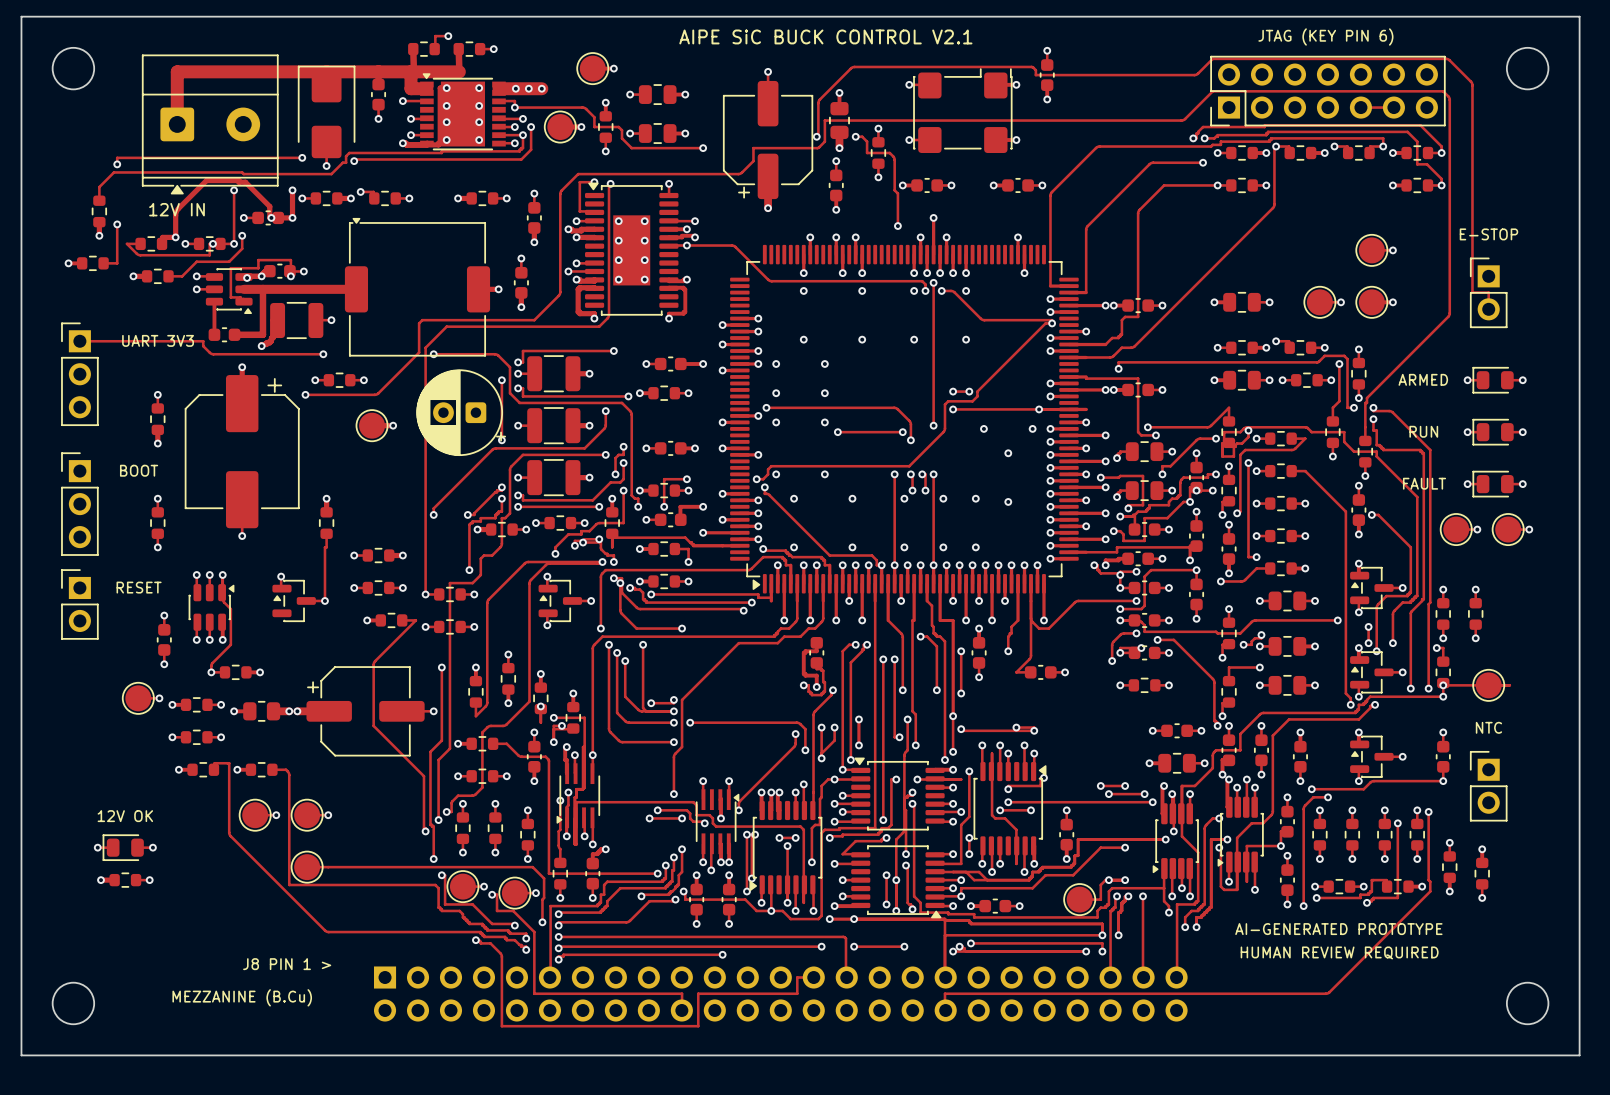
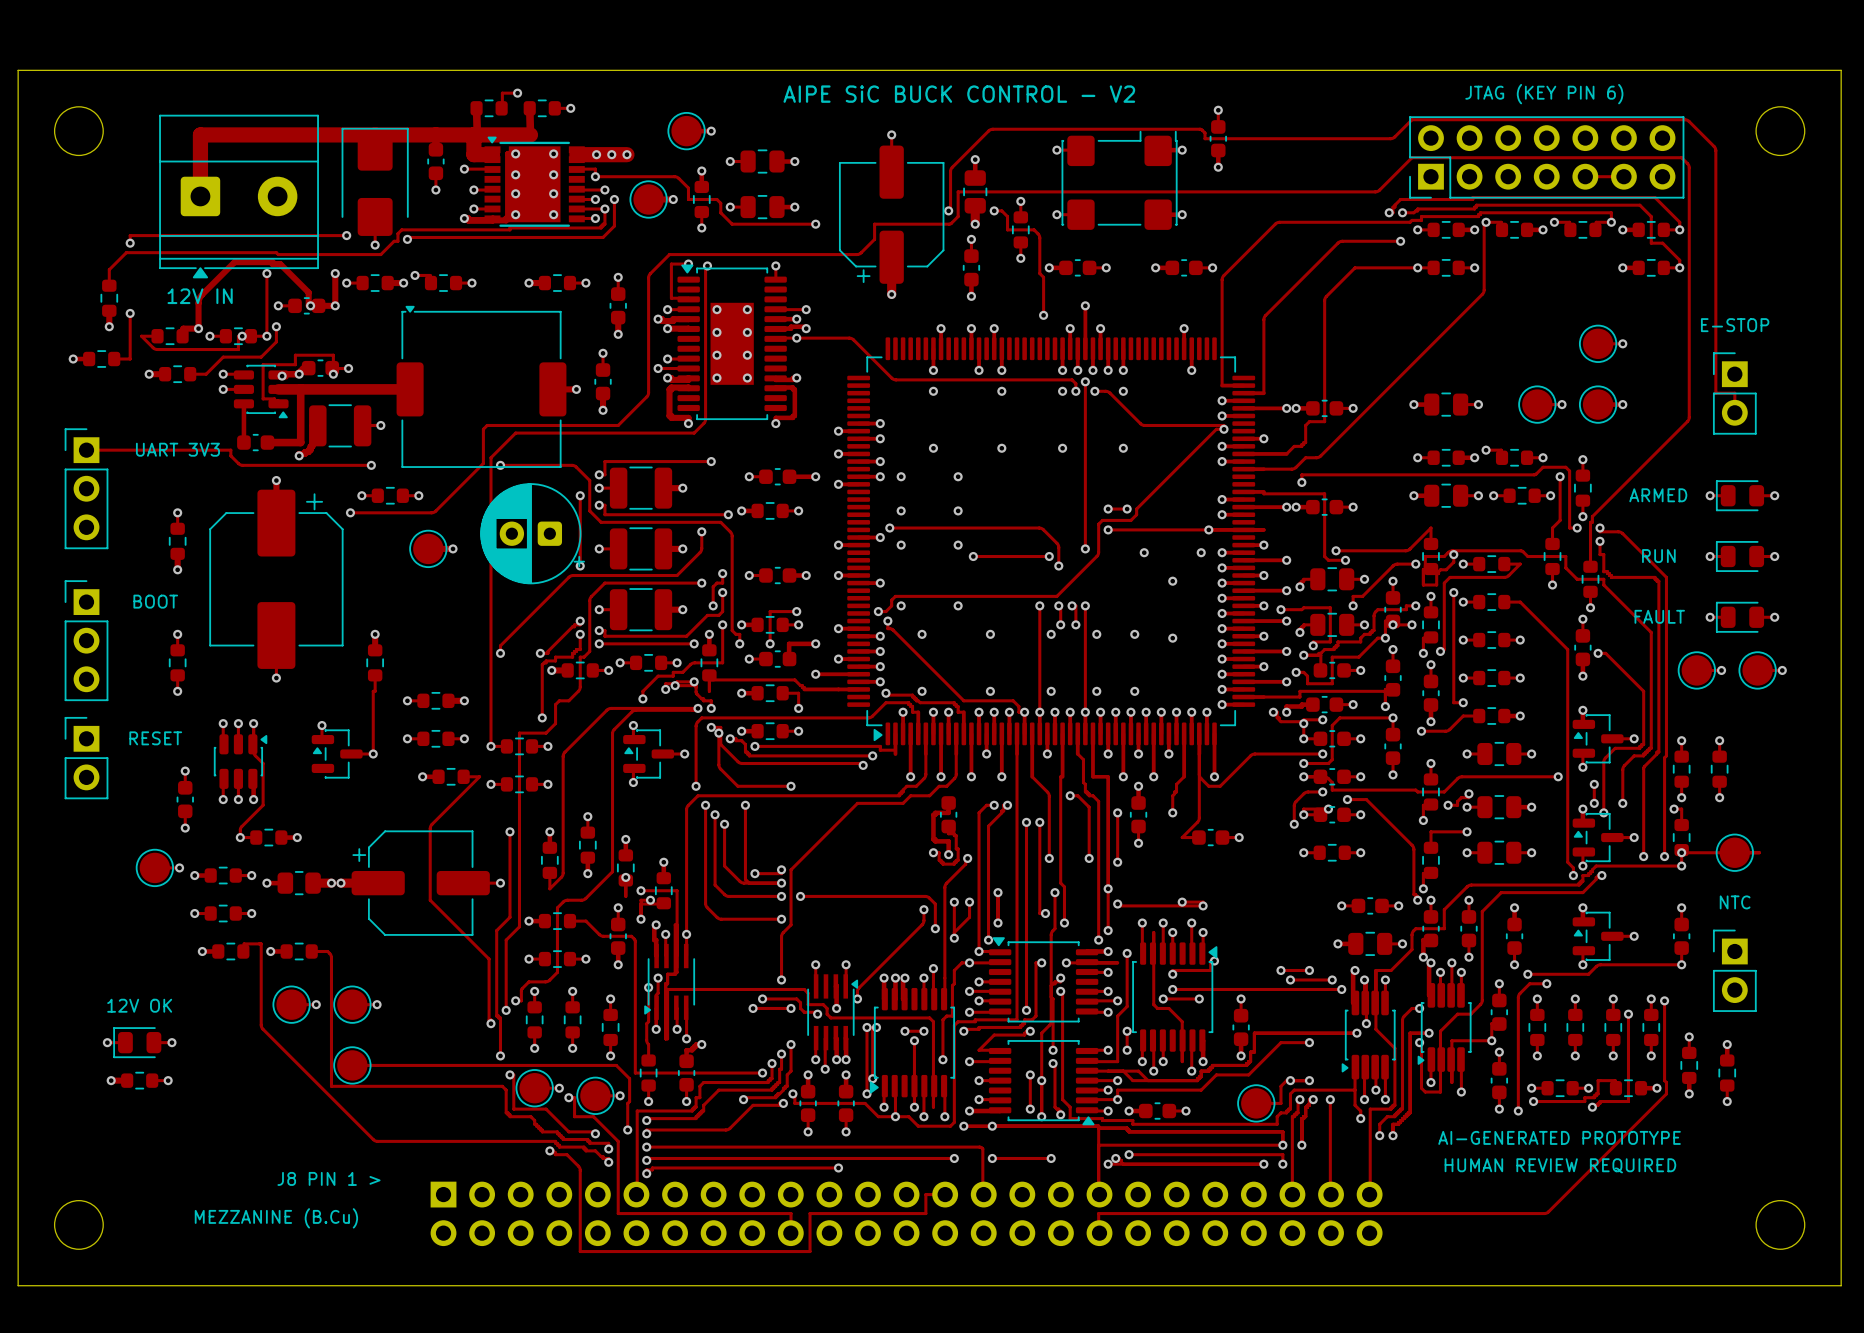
text: AIPE SiC BUCK CONTROL V2.1 (825, 36) -> AIPE SiC BUCK CONTROL - V2 (959, 94)

